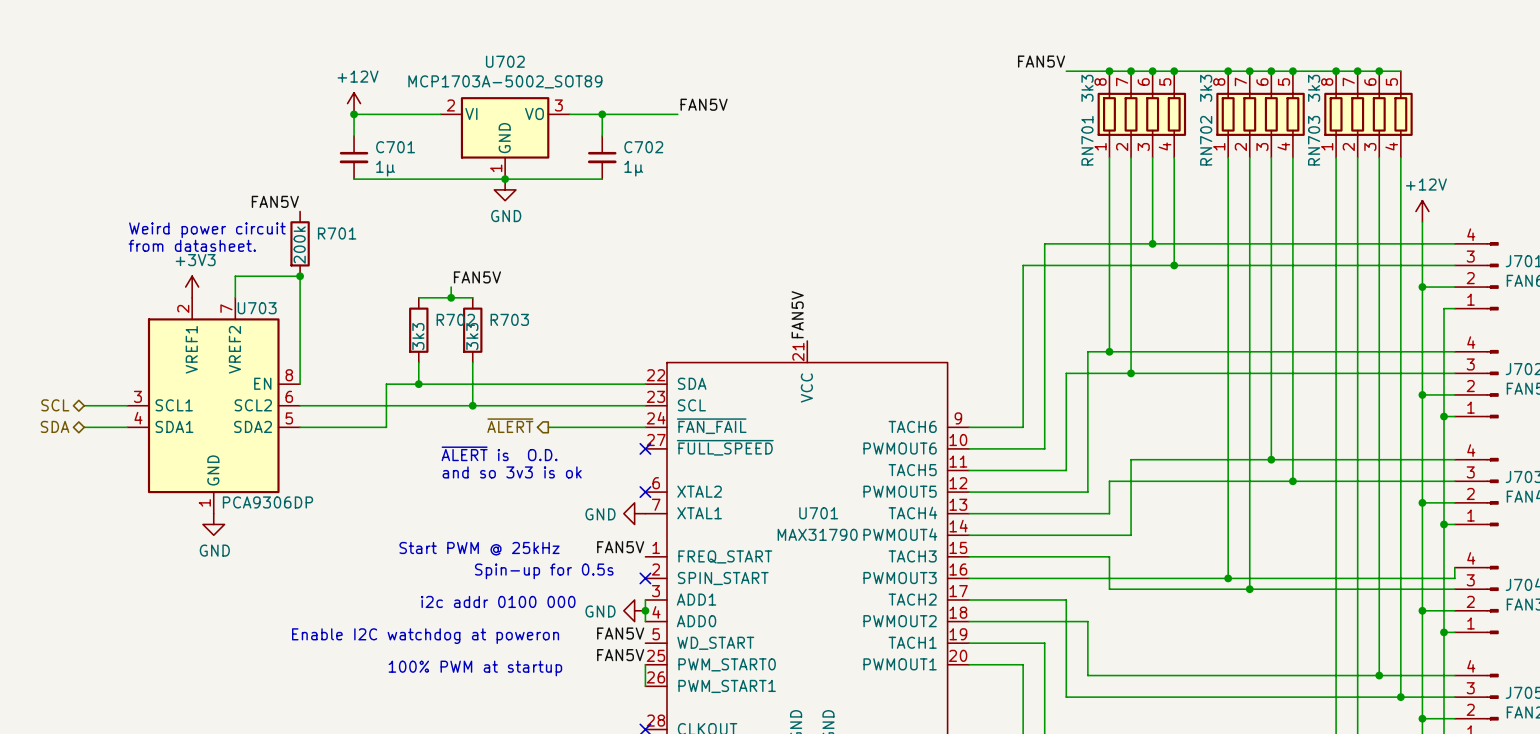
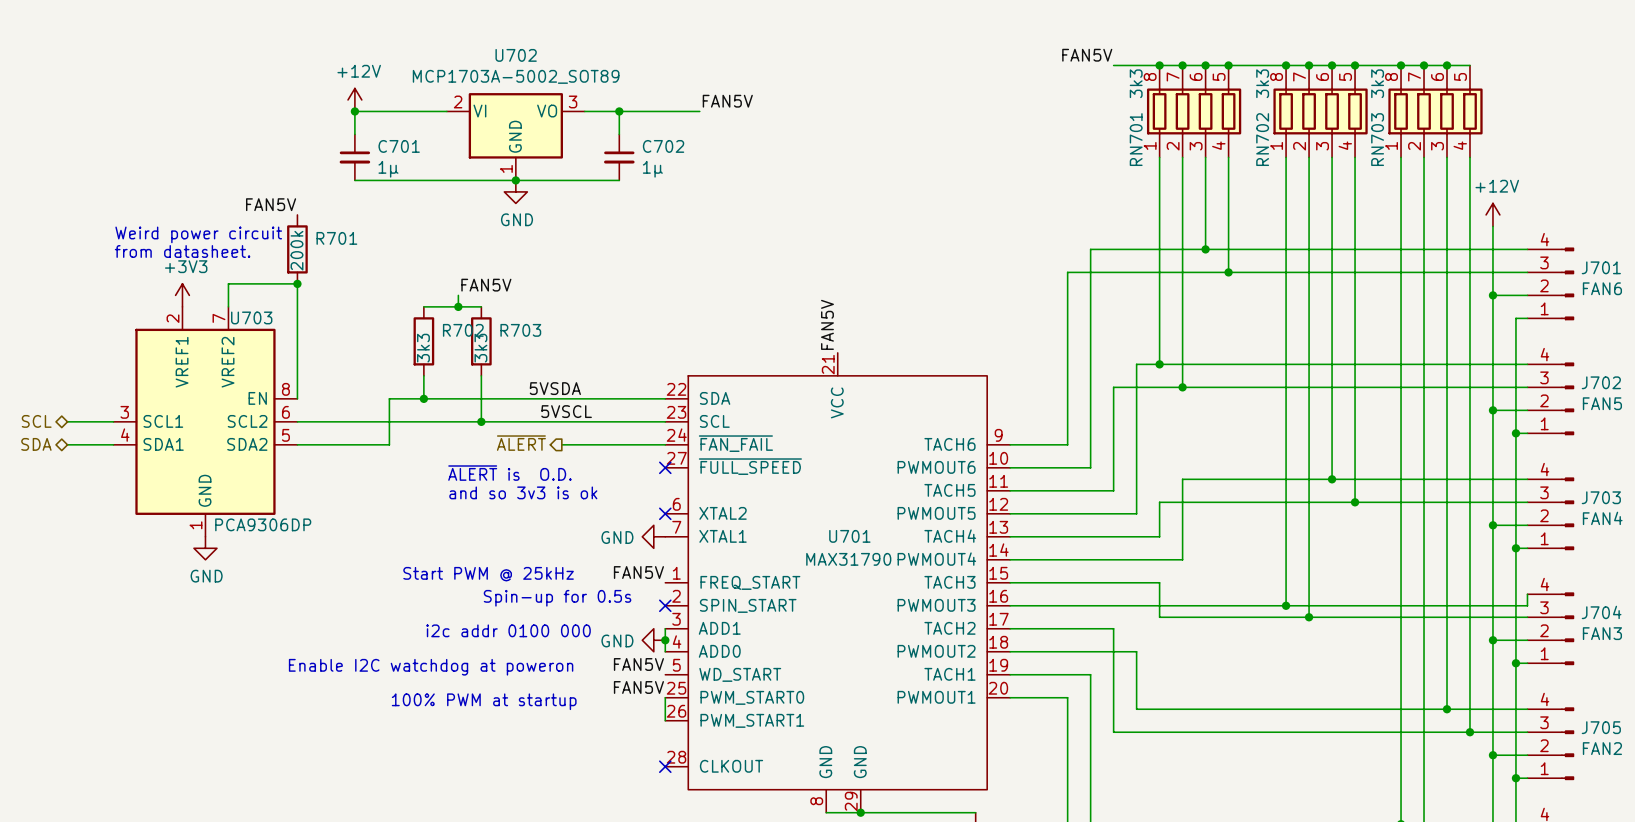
label: none -> 5VSDA (555, 388)
label: none -> 5VSCL (566, 411)

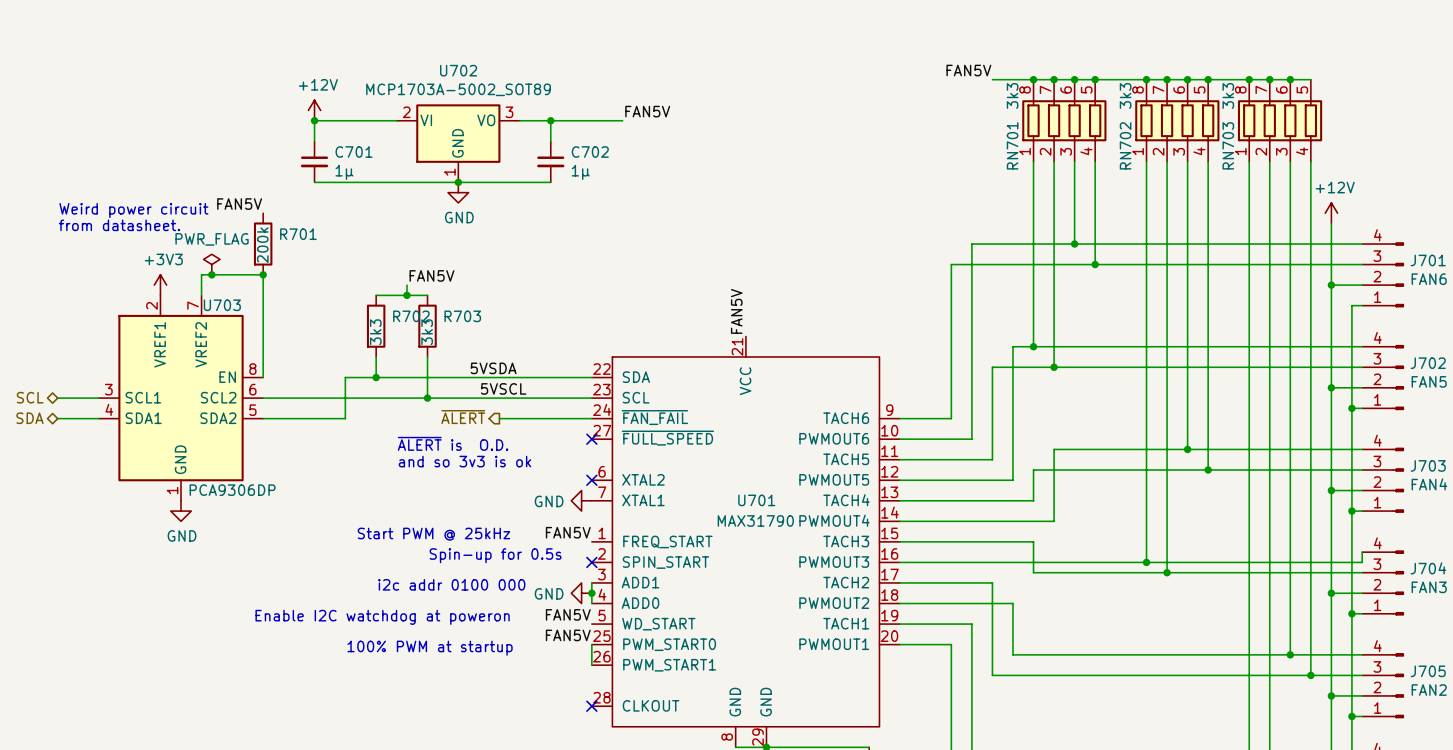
text position: Weird power circuit (198, 234) -> Weird power circuit (133, 210)
text position: from datasheet. (182, 251) -> from datasheet. (119, 225)
power symbol: none -> PWR_FLAG (211, 264)
junction: none -> (211, 274)

